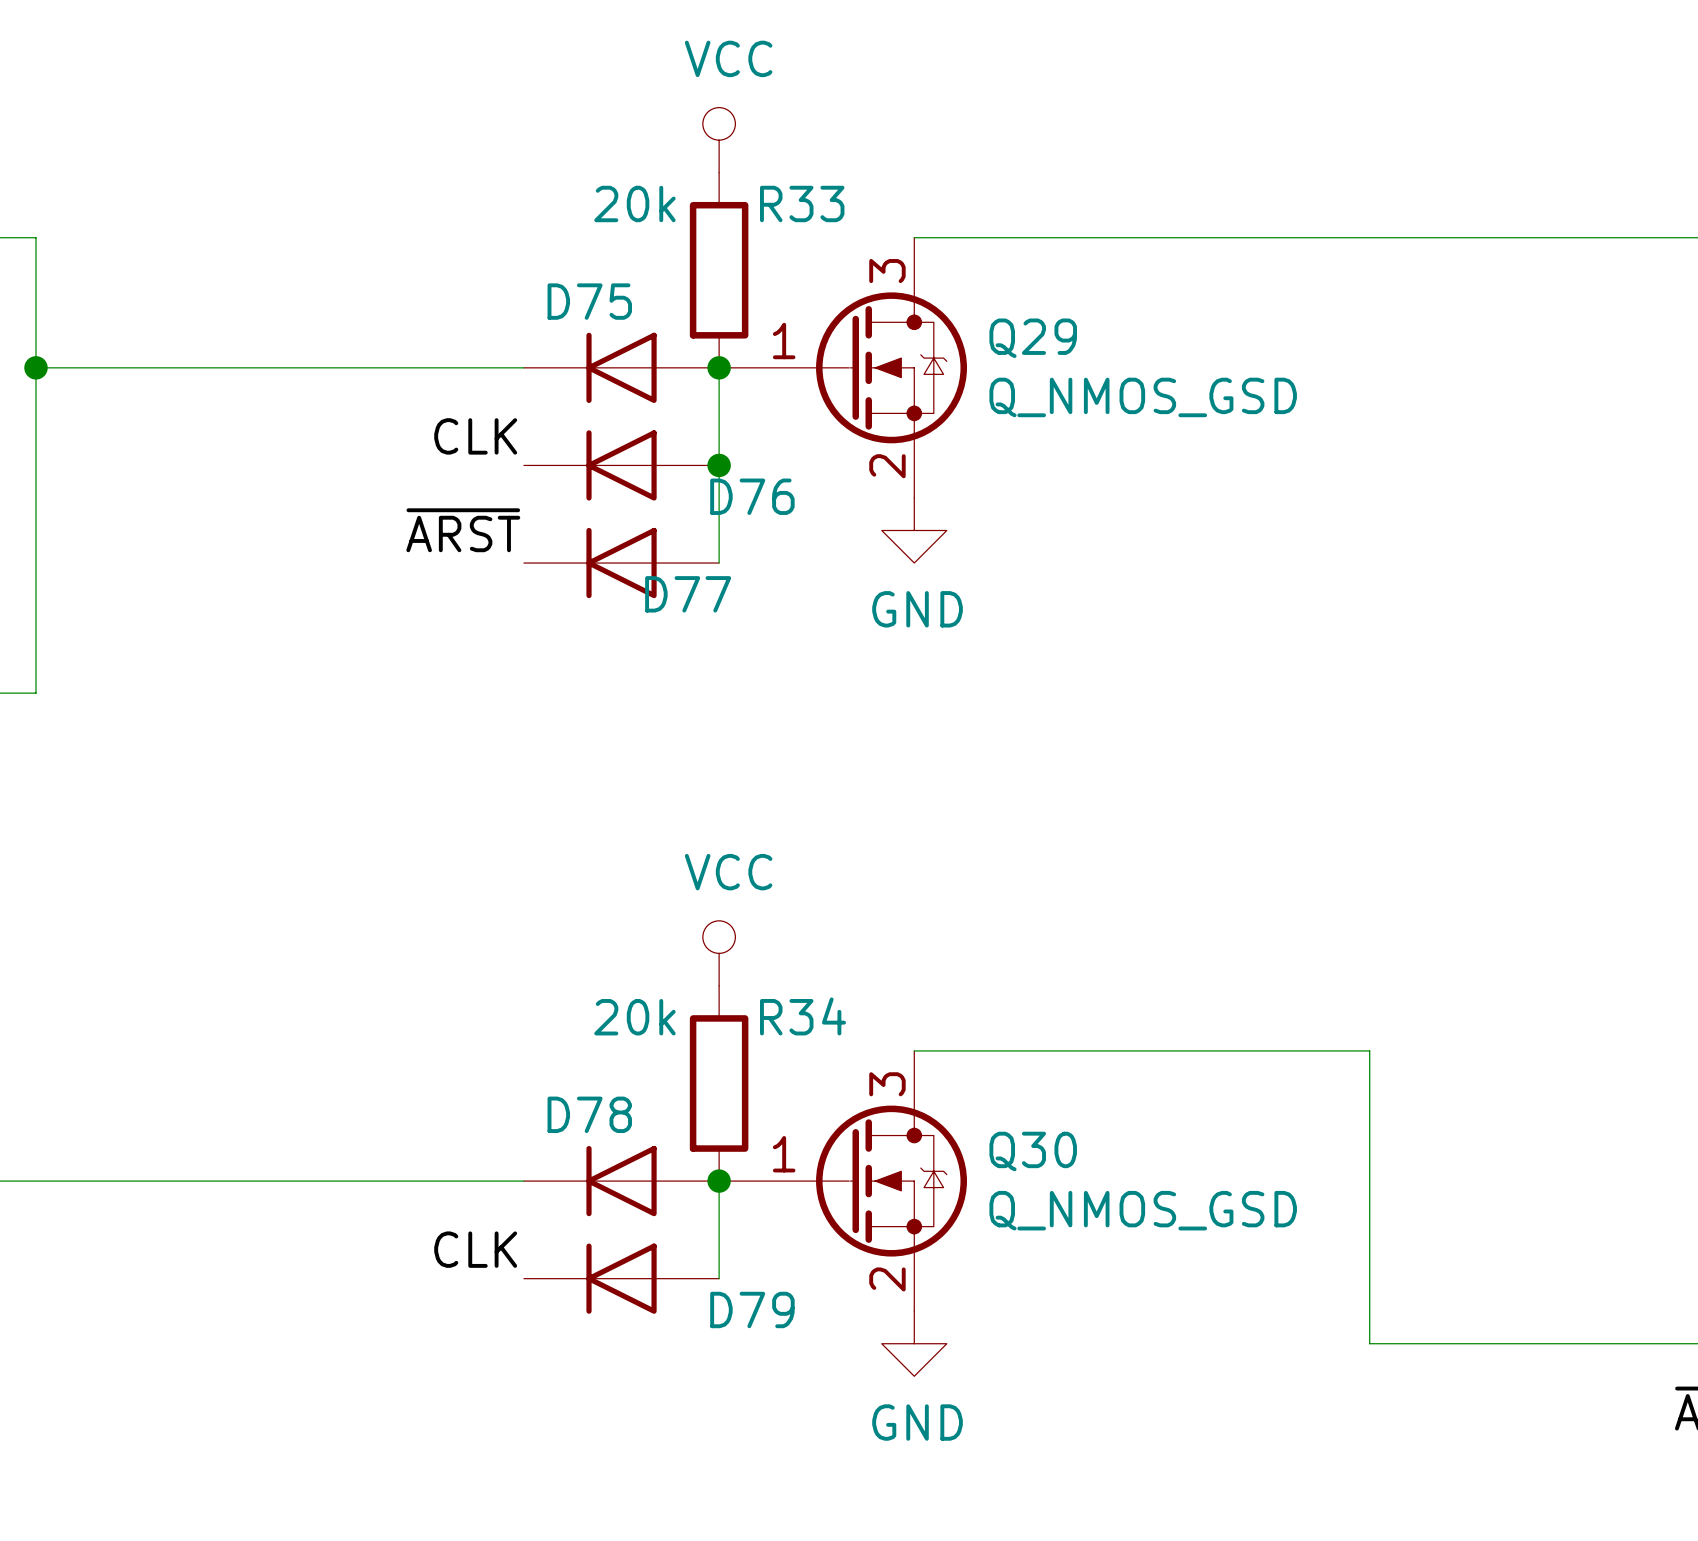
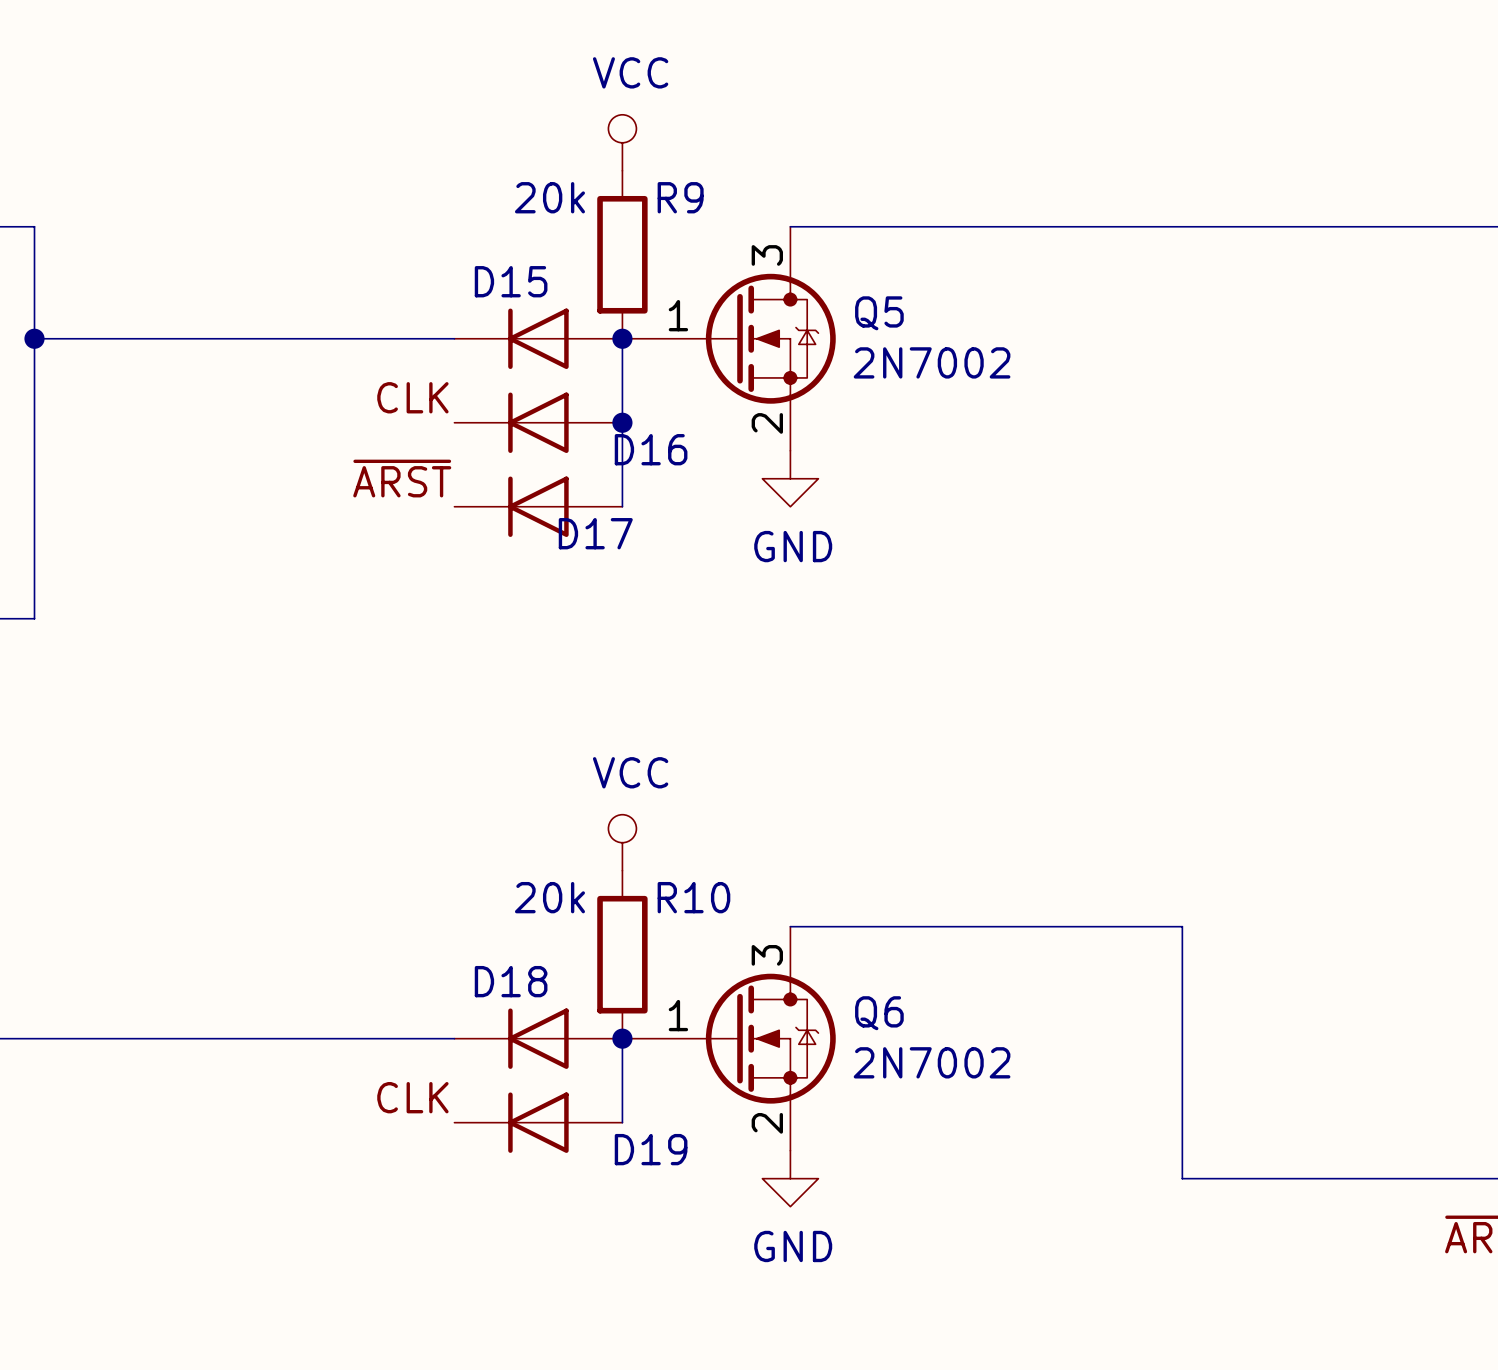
R33 name: R33 (802, 203) -> R9 (680, 197)
D75 name: D75 (589, 301) -> D15 (511, 281)
Q29 name: Q29 (1033, 338) -> Q5 (879, 313)
Q29 value: Q_NMOS_GSD (1143, 397) -> 2N7002 (932, 362)
D76 name: D76 (752, 496) -> D16 (651, 449)
D77 name: D77 (688, 594) -> D17 (595, 533)
R34 name: R34 (803, 1016) -> R10 (693, 897)
D78 name: D78 (589, 1114) -> D18 (511, 981)
Q30 name: Q30 (1033, 1151) -> Q6 (879, 1013)
Q30 value: Q_NMOS_GSD (1143, 1210) -> 2N7002 (932, 1062)
D79 name: D79 (752, 1309) -> D19 (651, 1149)

